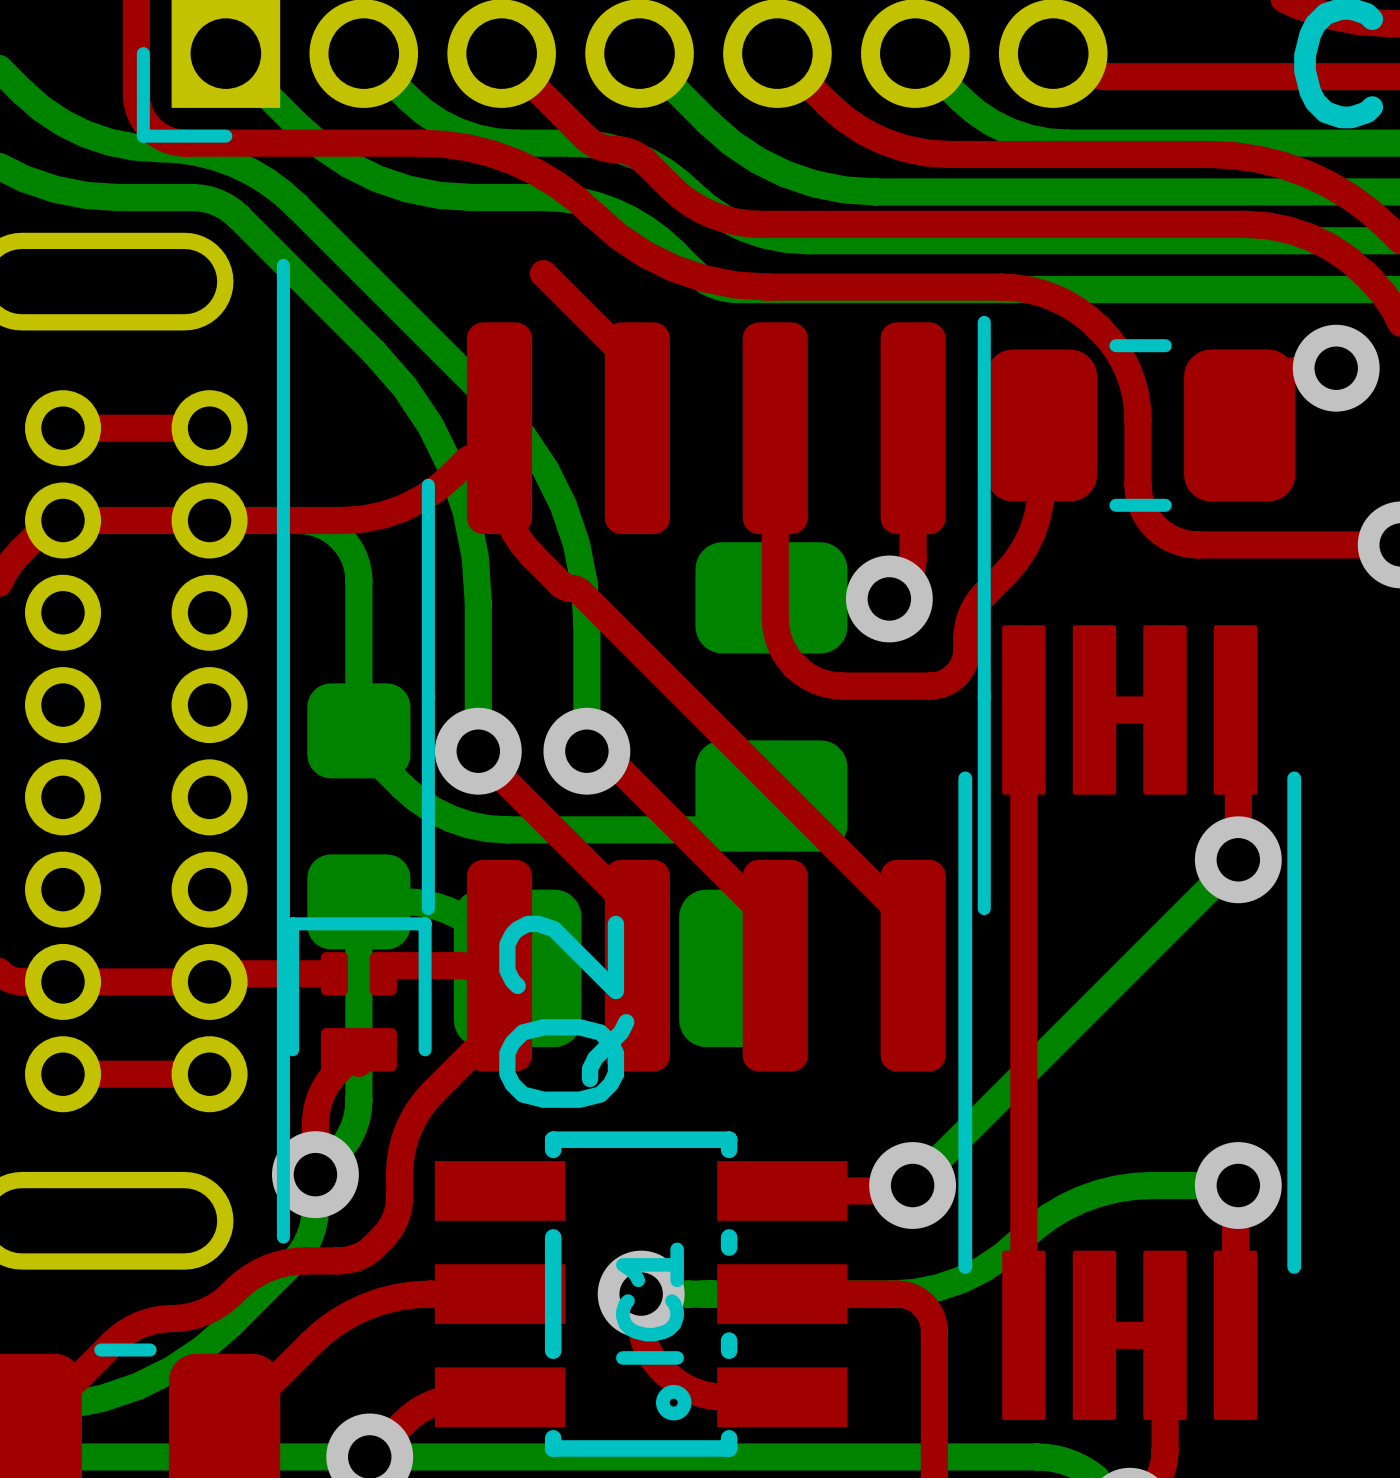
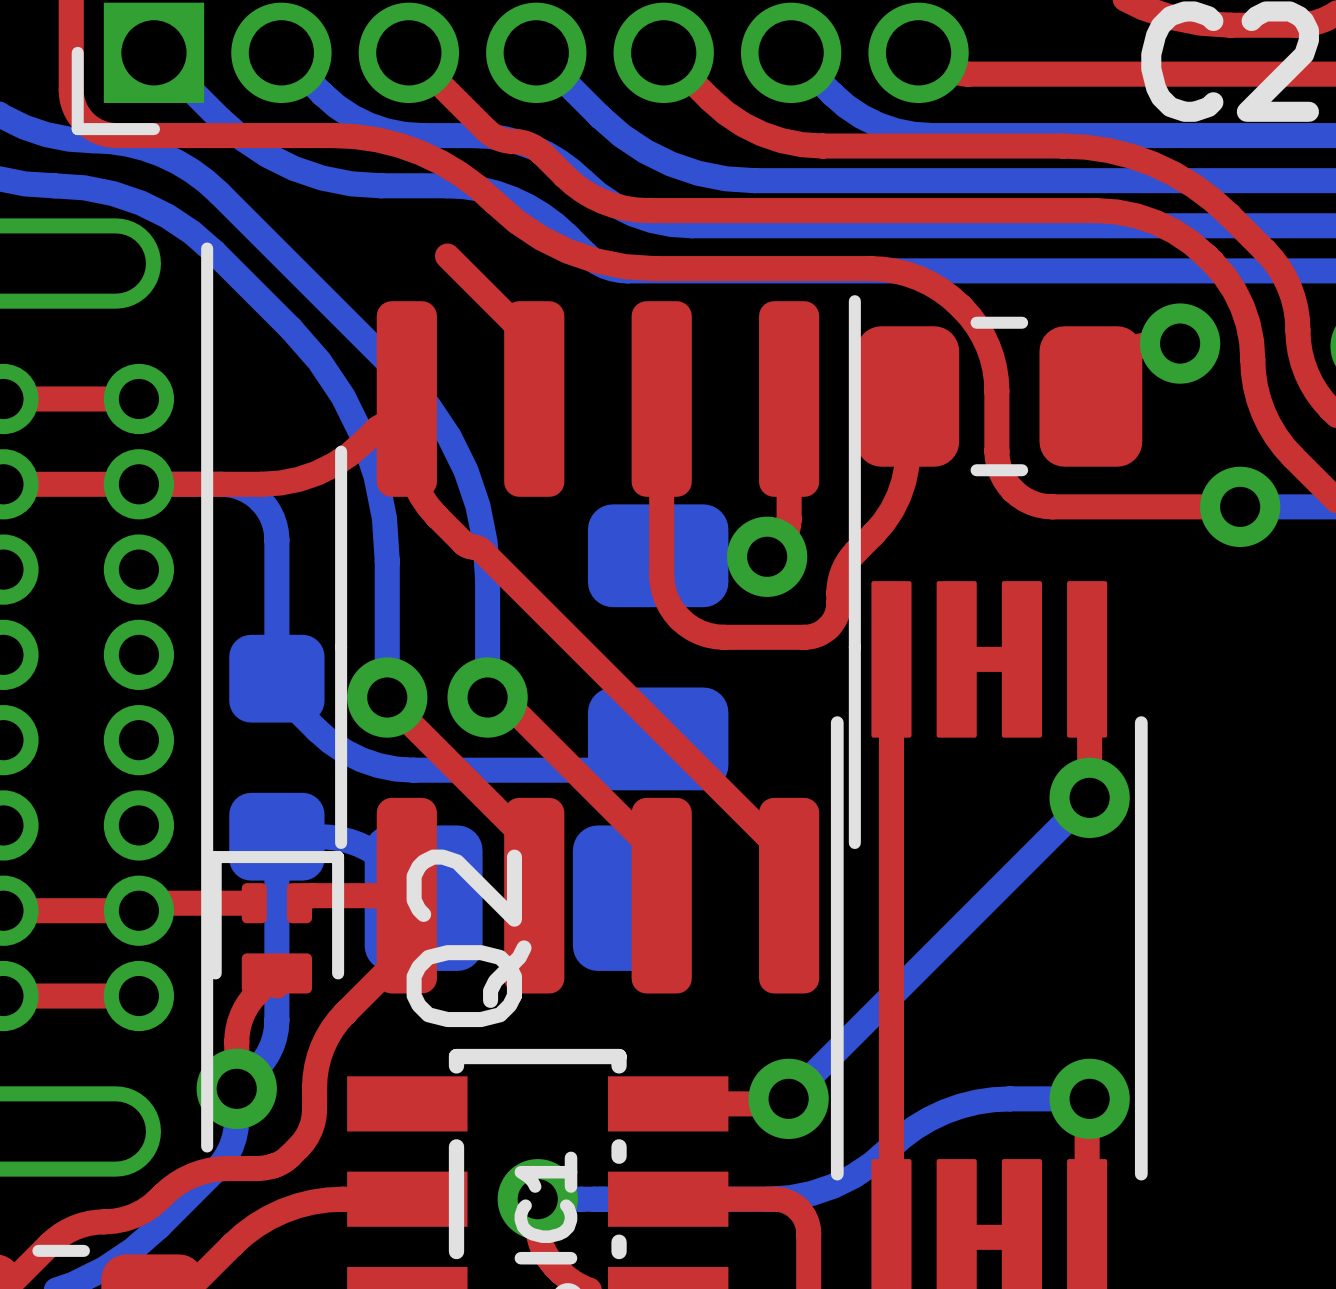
bottom track: (118, 197) (192, 197) (217, 202) (238, 216) (291, 269) -> (54, 185) (83, 187) (112, 193) (140, 203) (167, 216) (191, 232) (214, 252)

